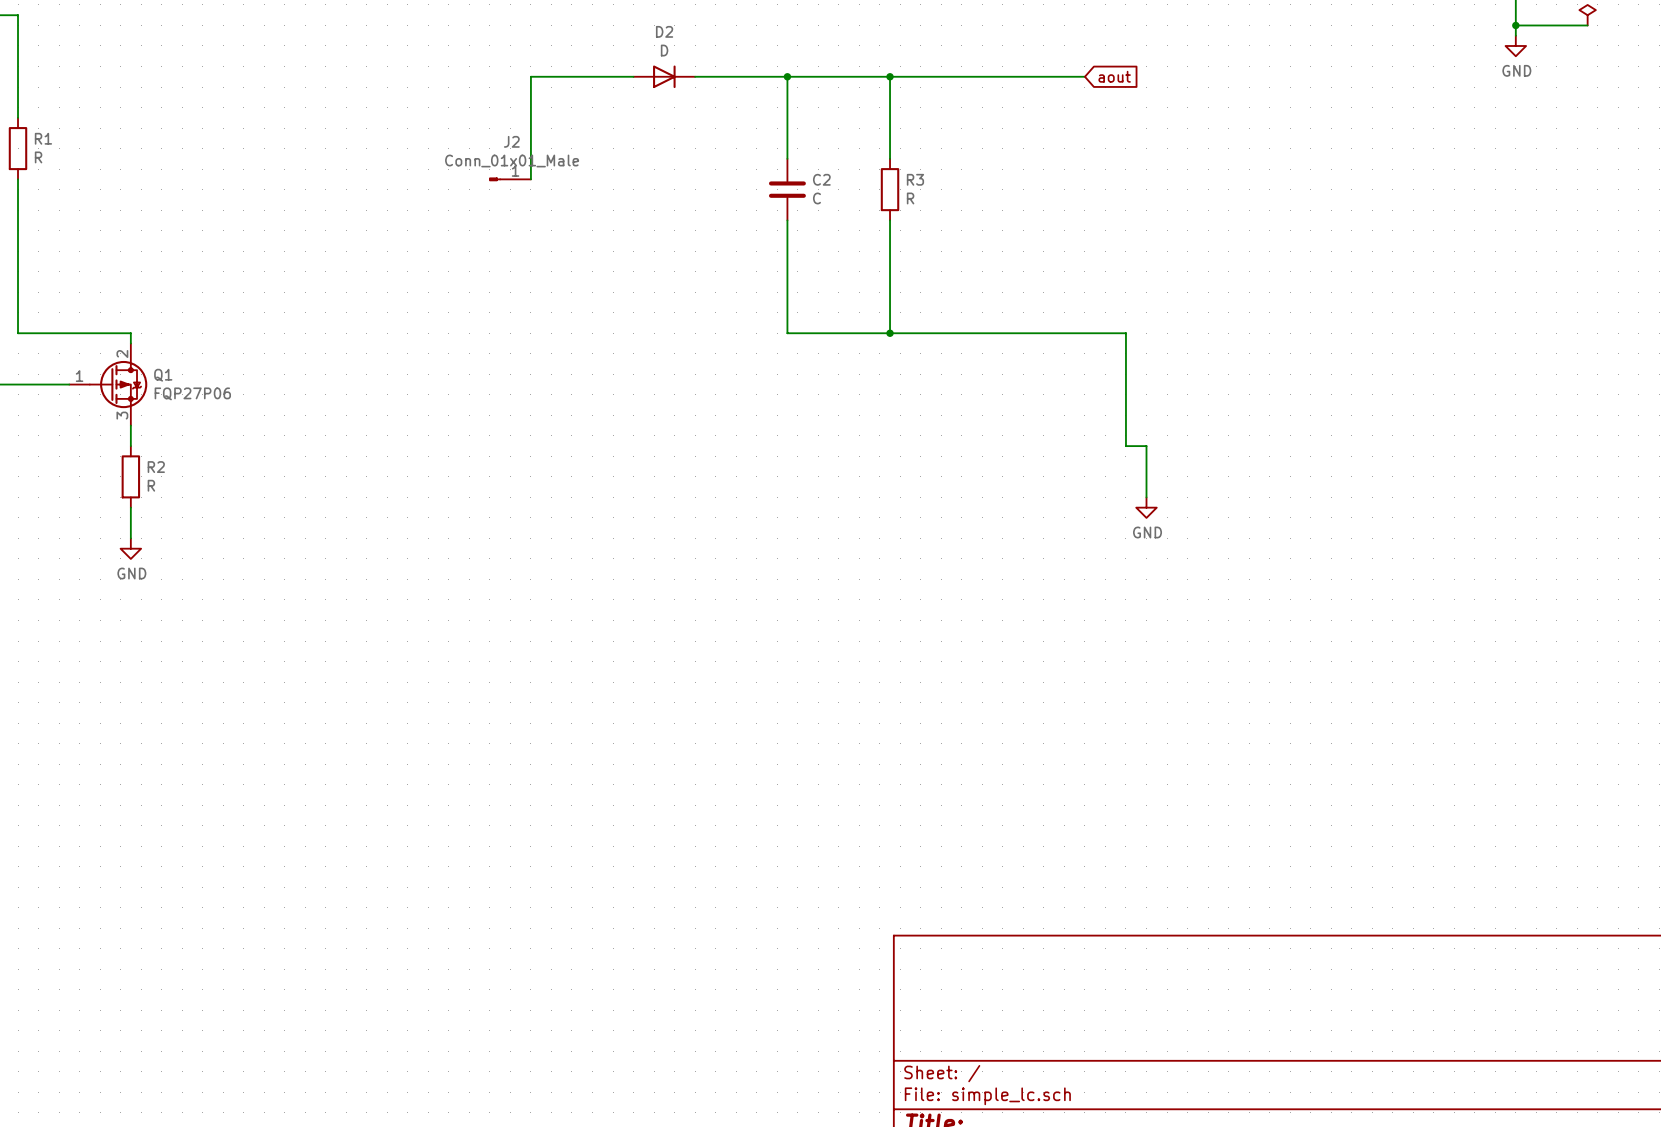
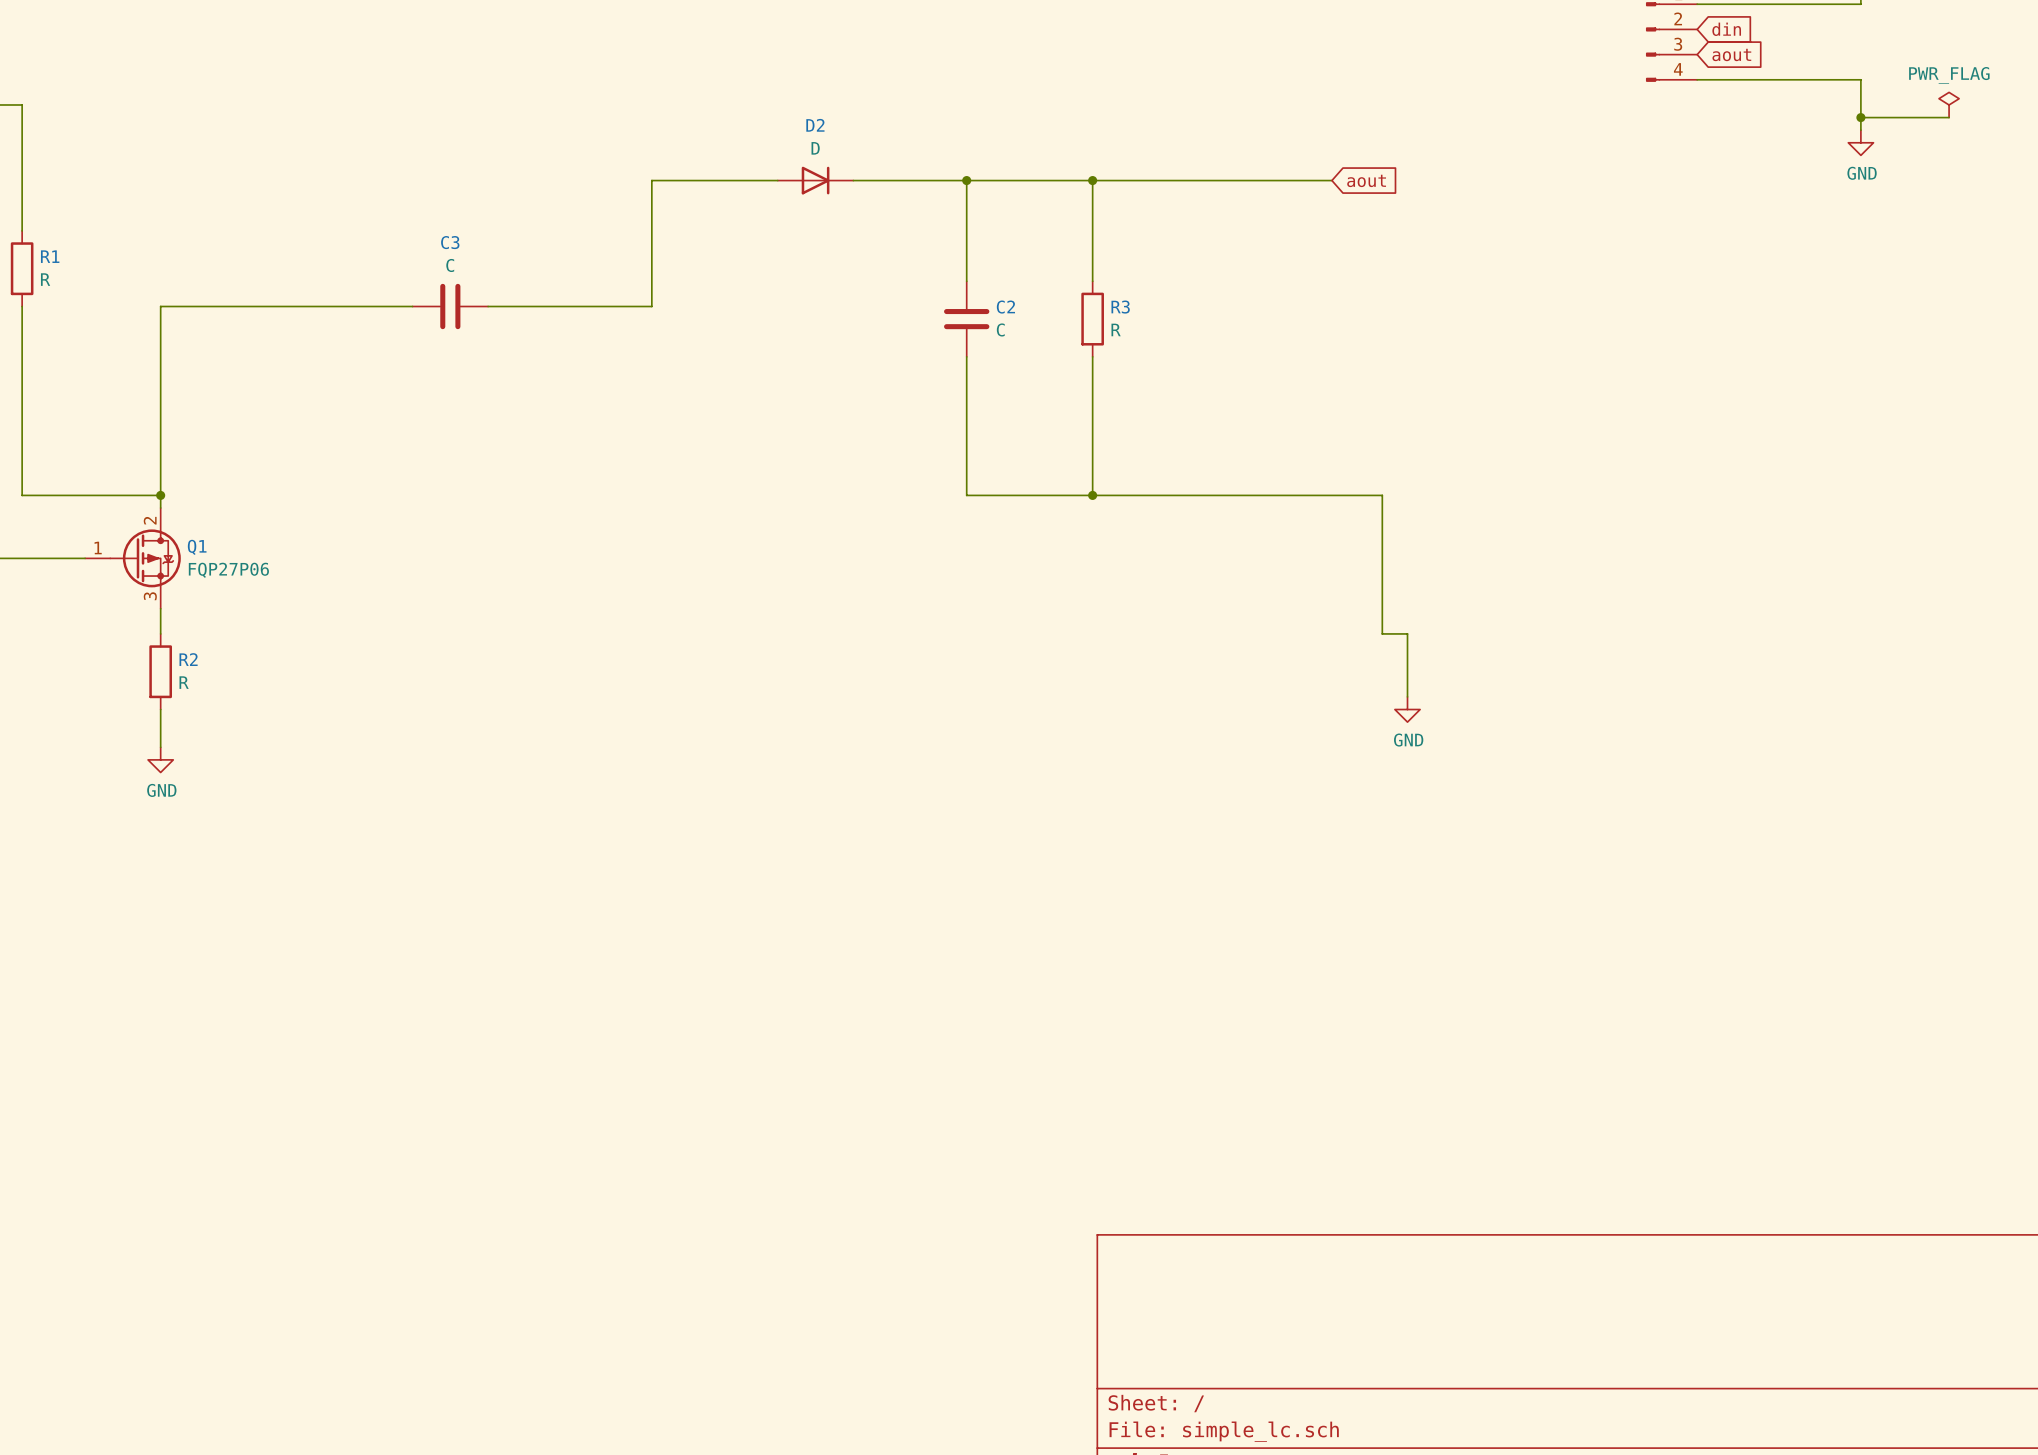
wire: none -> (412, 306) (160, 306) (160, 495)
C3: none -> C (450, 306)
wire: none -> (488, 306) (651, 306)
J2: Conn_01x01_Male (510, 179) -> none
junction: none -> (160, 495)

